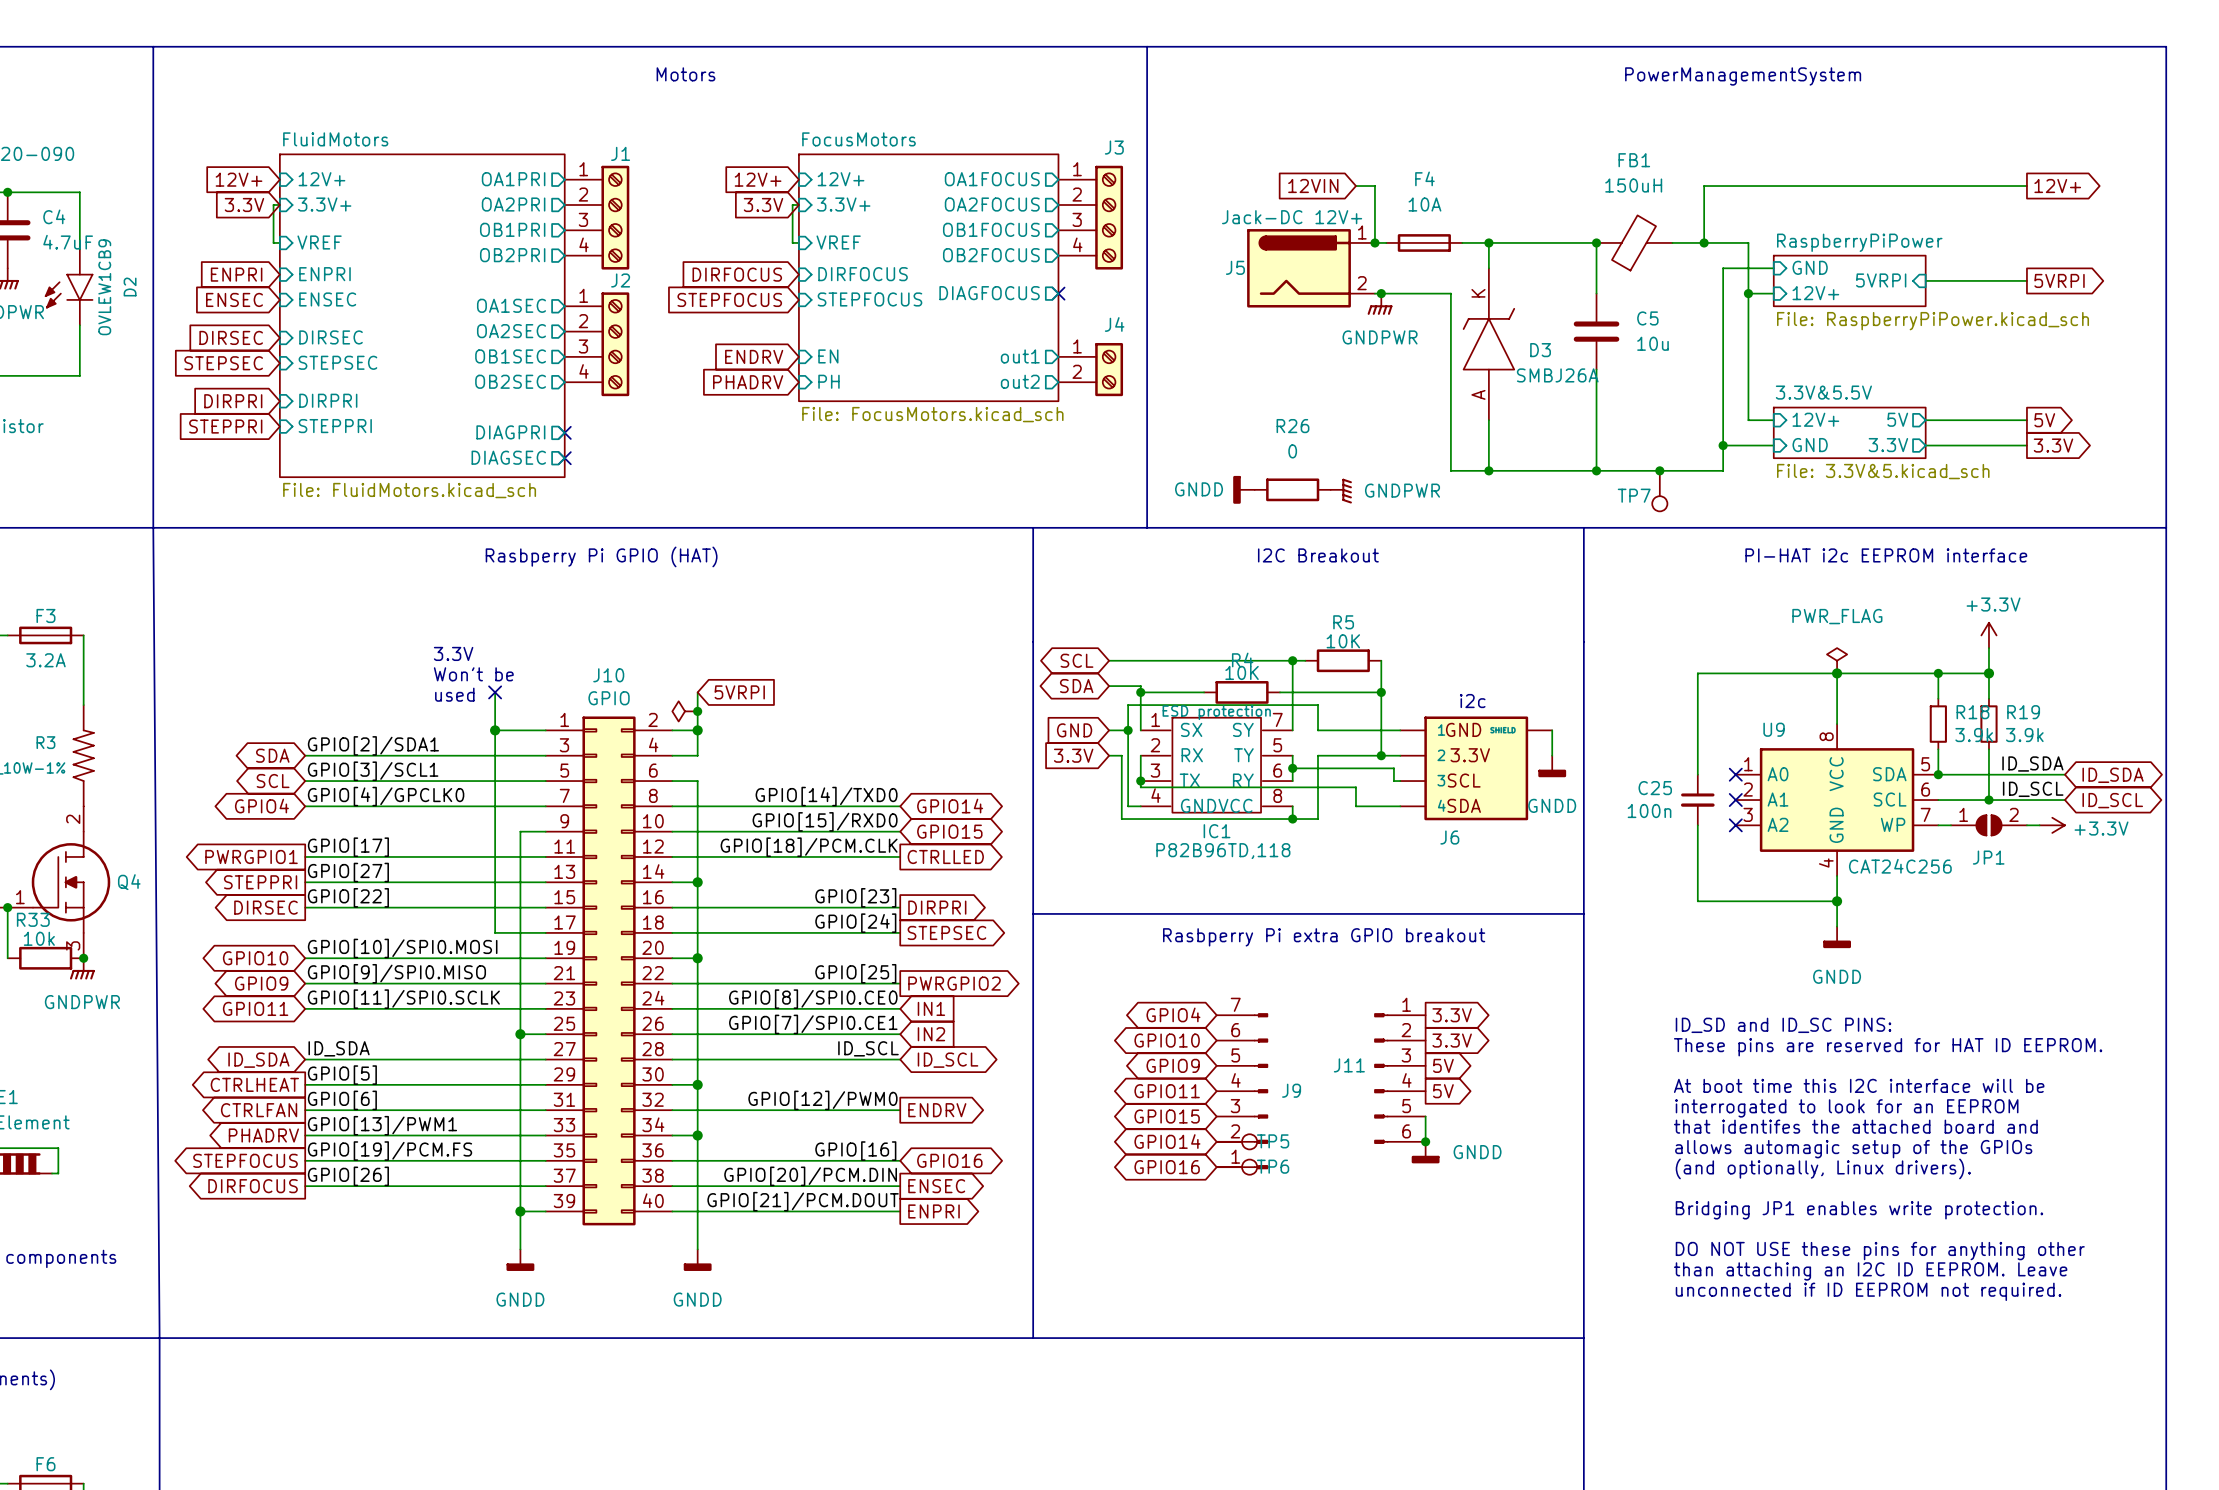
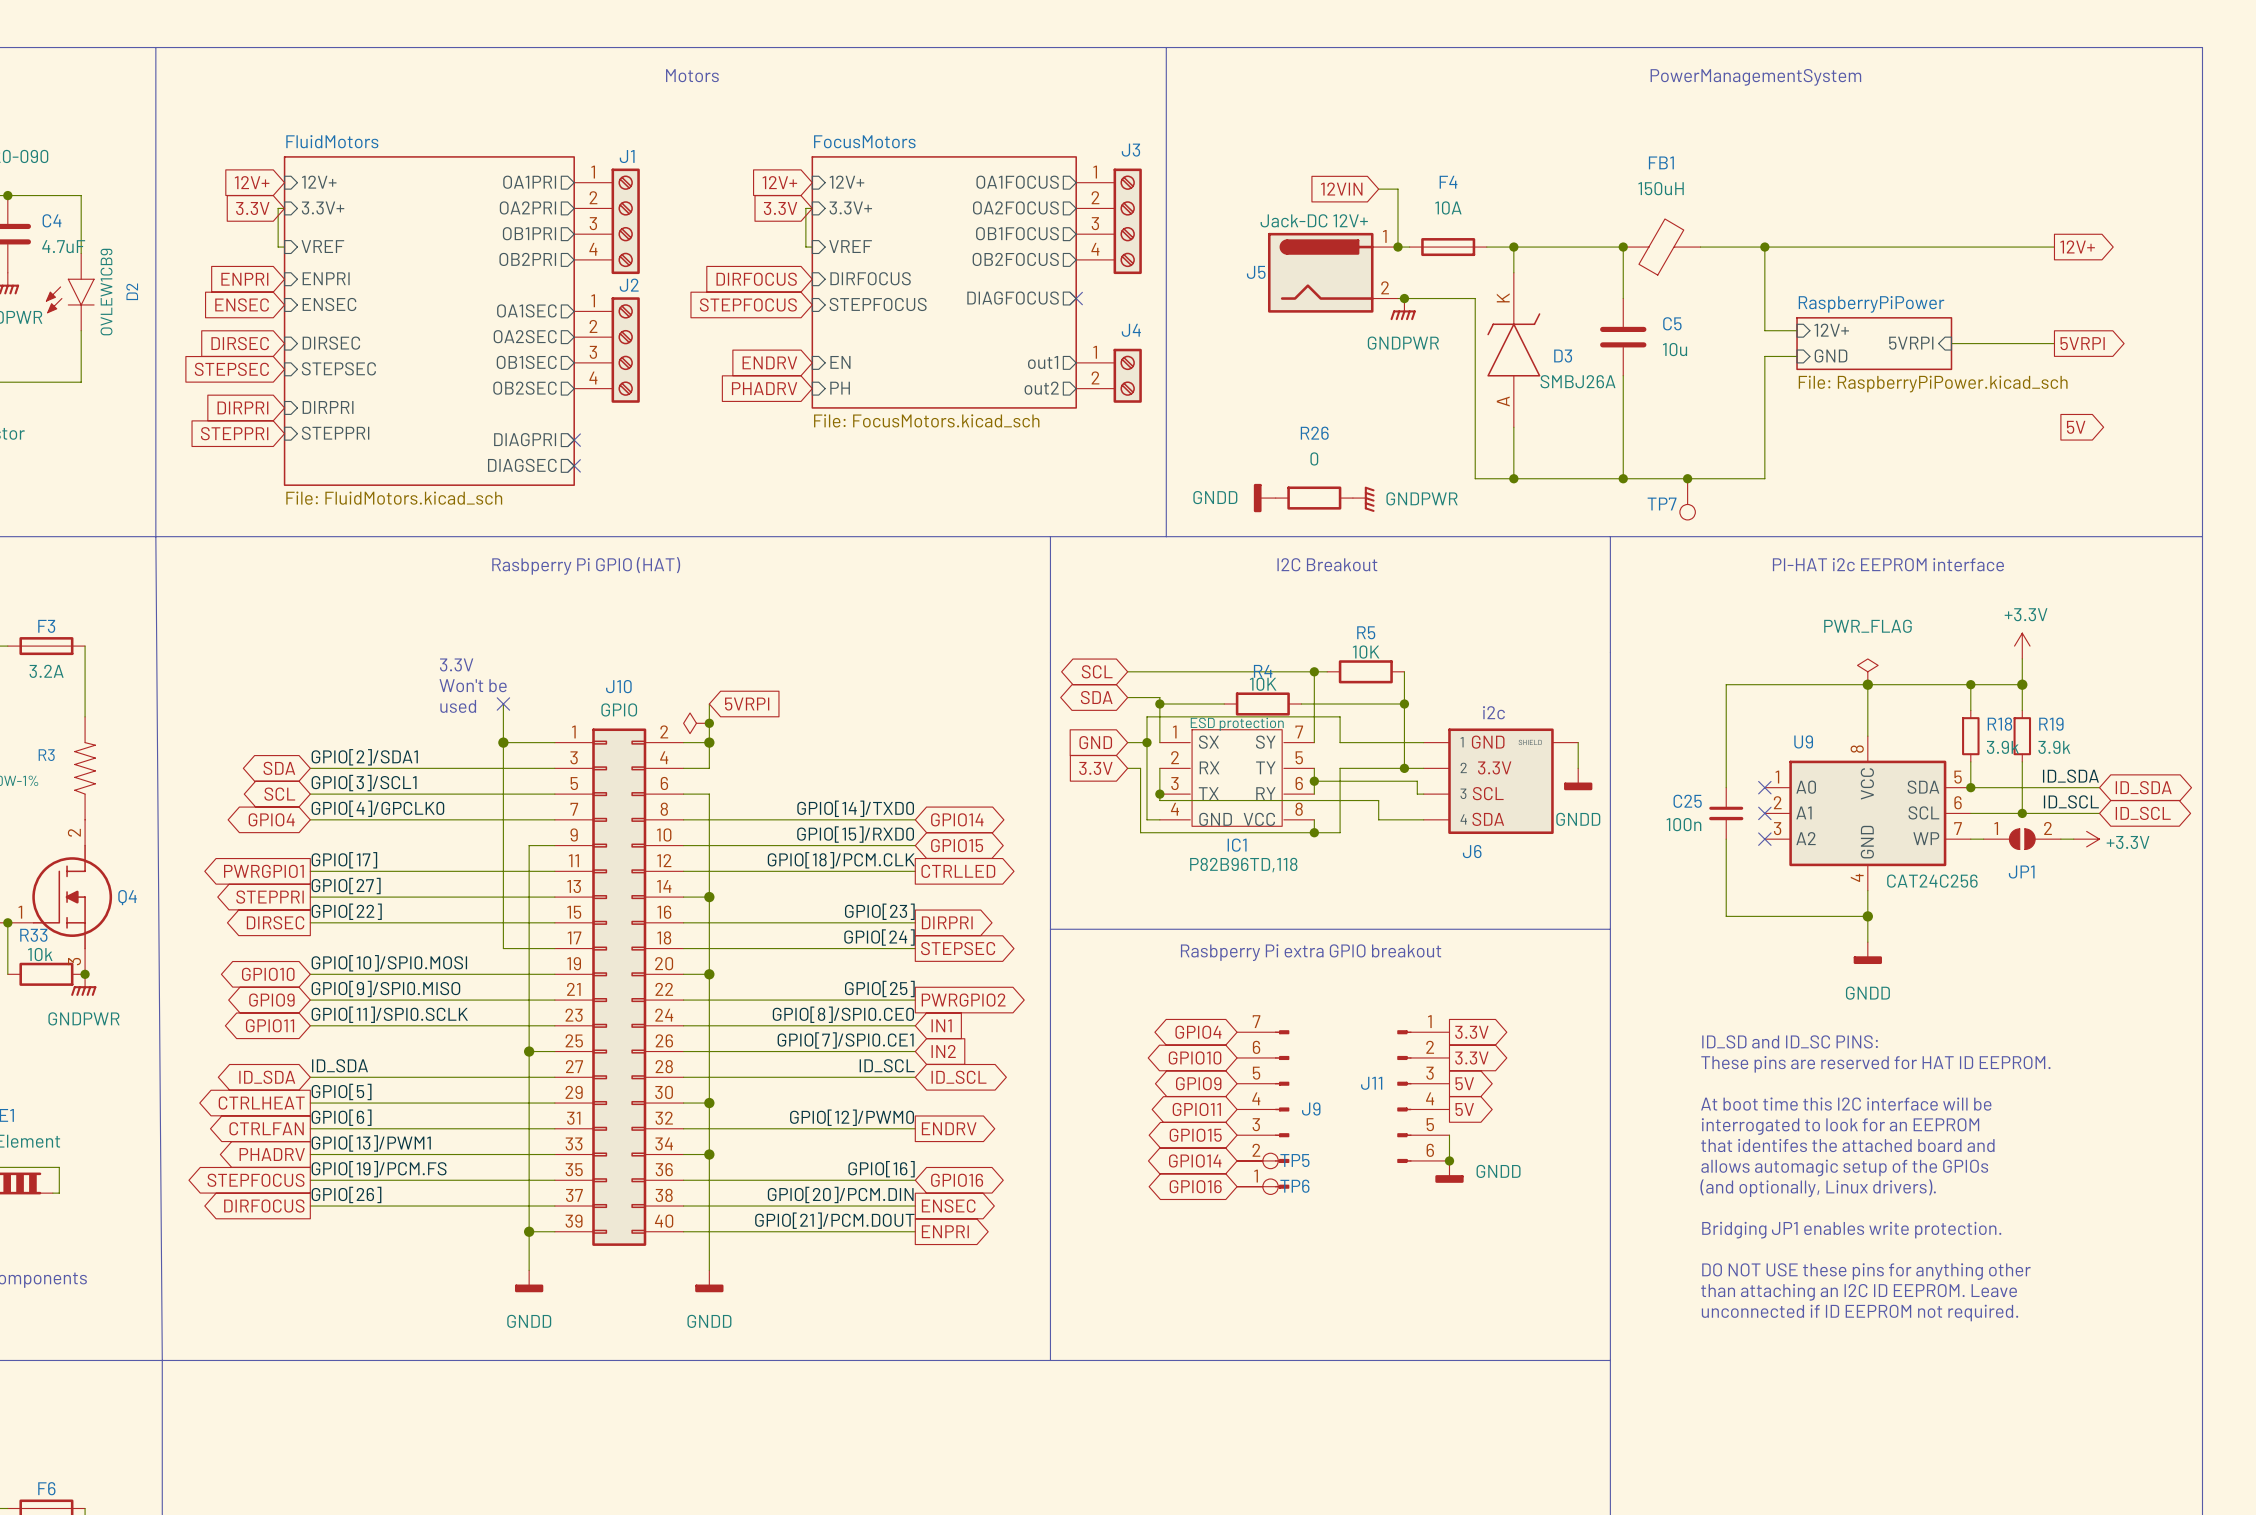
wire: (2026, 186) (1704, 186) (1704, 242) -> none
global label position: 12V+ (2057, 186) -> 12V+ (2077, 246)
junction: (1704, 242) -> none
wire: none -> (1764, 247) (1764, 330) (1797, 330)
junction: none -> (1764, 247)
wire: (1748, 242) (1748, 420) (1773, 420) -> (1777, 247) (2054, 247)
sheet pin: GND (1810, 267) -> none
wire: (1773, 268) (1723, 268) (1723, 470) -> (1797, 356) (1764, 356) (1764, 478) (1751, 478)
sheet RaspberryPiPower position: (1849, 280) -> (1874, 343)
sheet pin position: 5VRPI (1881, 280) -> 5VRPI (1911, 343)
wire: (1925, 280) (2026, 280) -> (1951, 343) (2054, 343)
global label position: 5VRPI (2059, 280) -> 5VRPI (2082, 343)
wire: (1748, 293) (1773, 293) -> none
junction: (1748, 293) -> none
sheet pin position: 12V+ (1815, 293) -> 12V+ (1831, 330)
sheet pin: none -> GND (1831, 355)
sheet pin: 12V+ (1815, 419) -> none
sheet pin: 5V (1897, 419) -> none
wire: (1925, 420) (2026, 420) -> none
sheet 3.3V&5.5V: File: 3.3V&5.kicad_sch (1849, 432) -> none
wire: (1723, 445) (1773, 445) -> none
junction: (1723, 445) -> none
sheet pin: GND (1810, 445) -> none
sheet pin: 3.3V (1888, 445) -> none
wire: (1925, 445) (2026, 445) -> none
global label: 3.3V (2053, 445) -> none

